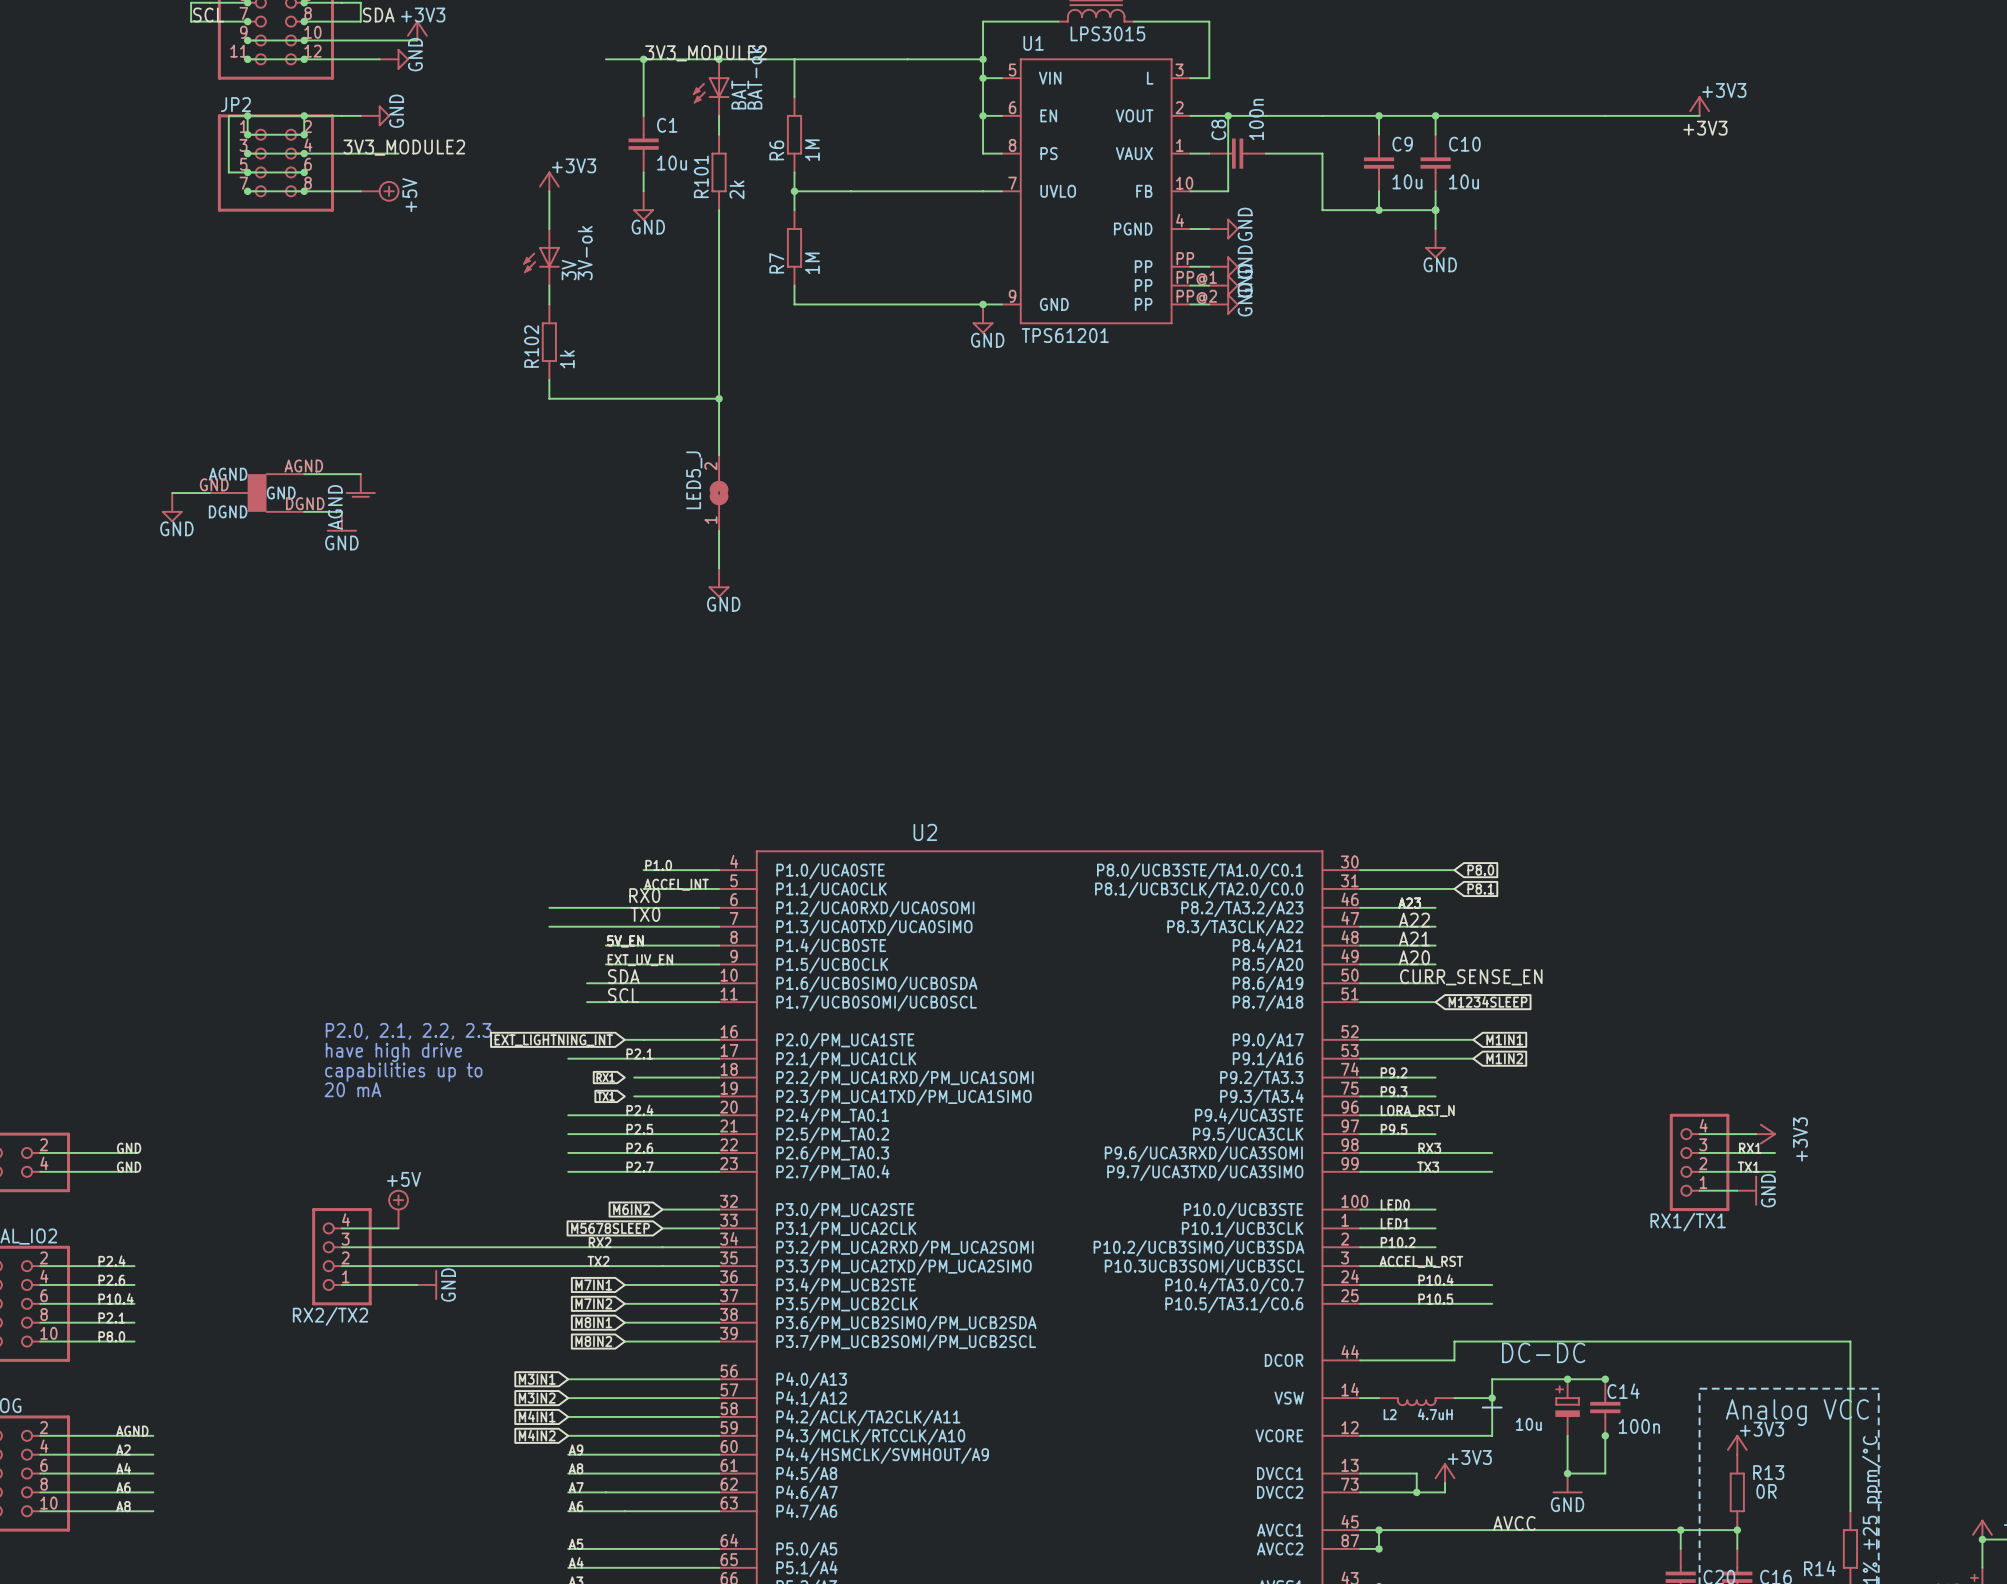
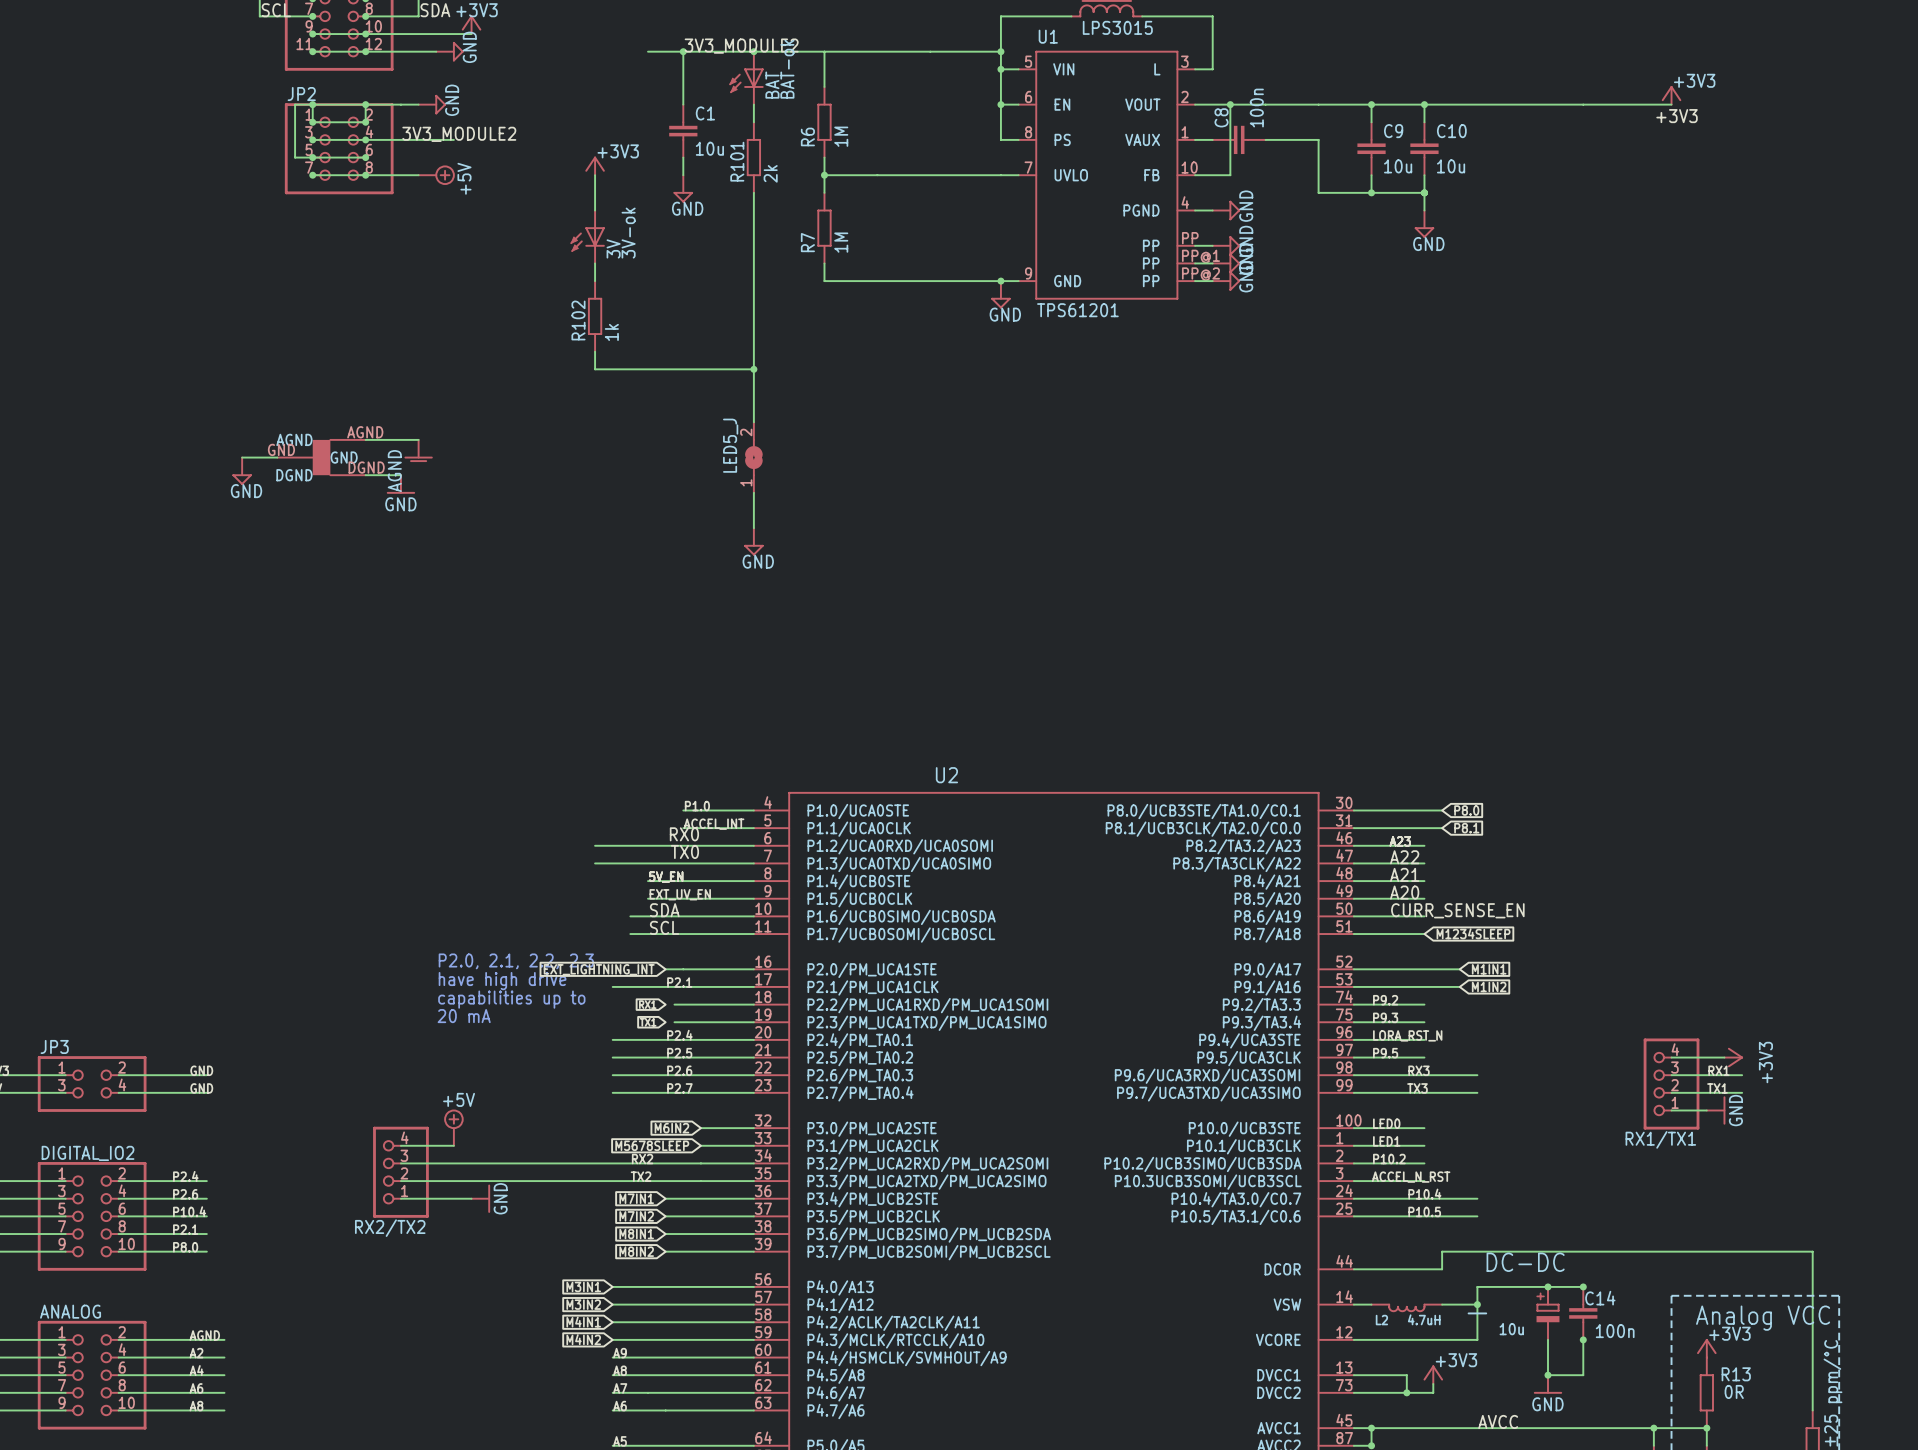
text position: P2.0, 2.1, 2.2, 2.3 (408, 1031) -> P2.0, 2.1, 2.2, 2.3 (516, 961)
text position: have high drive (393, 1052) -> have high drive (502, 981)
text position: capabilities up to (403, 1072) -> capabilities up to (511, 999)
text position: 20 mA (352, 1089) -> 20 mA (464, 1016)

